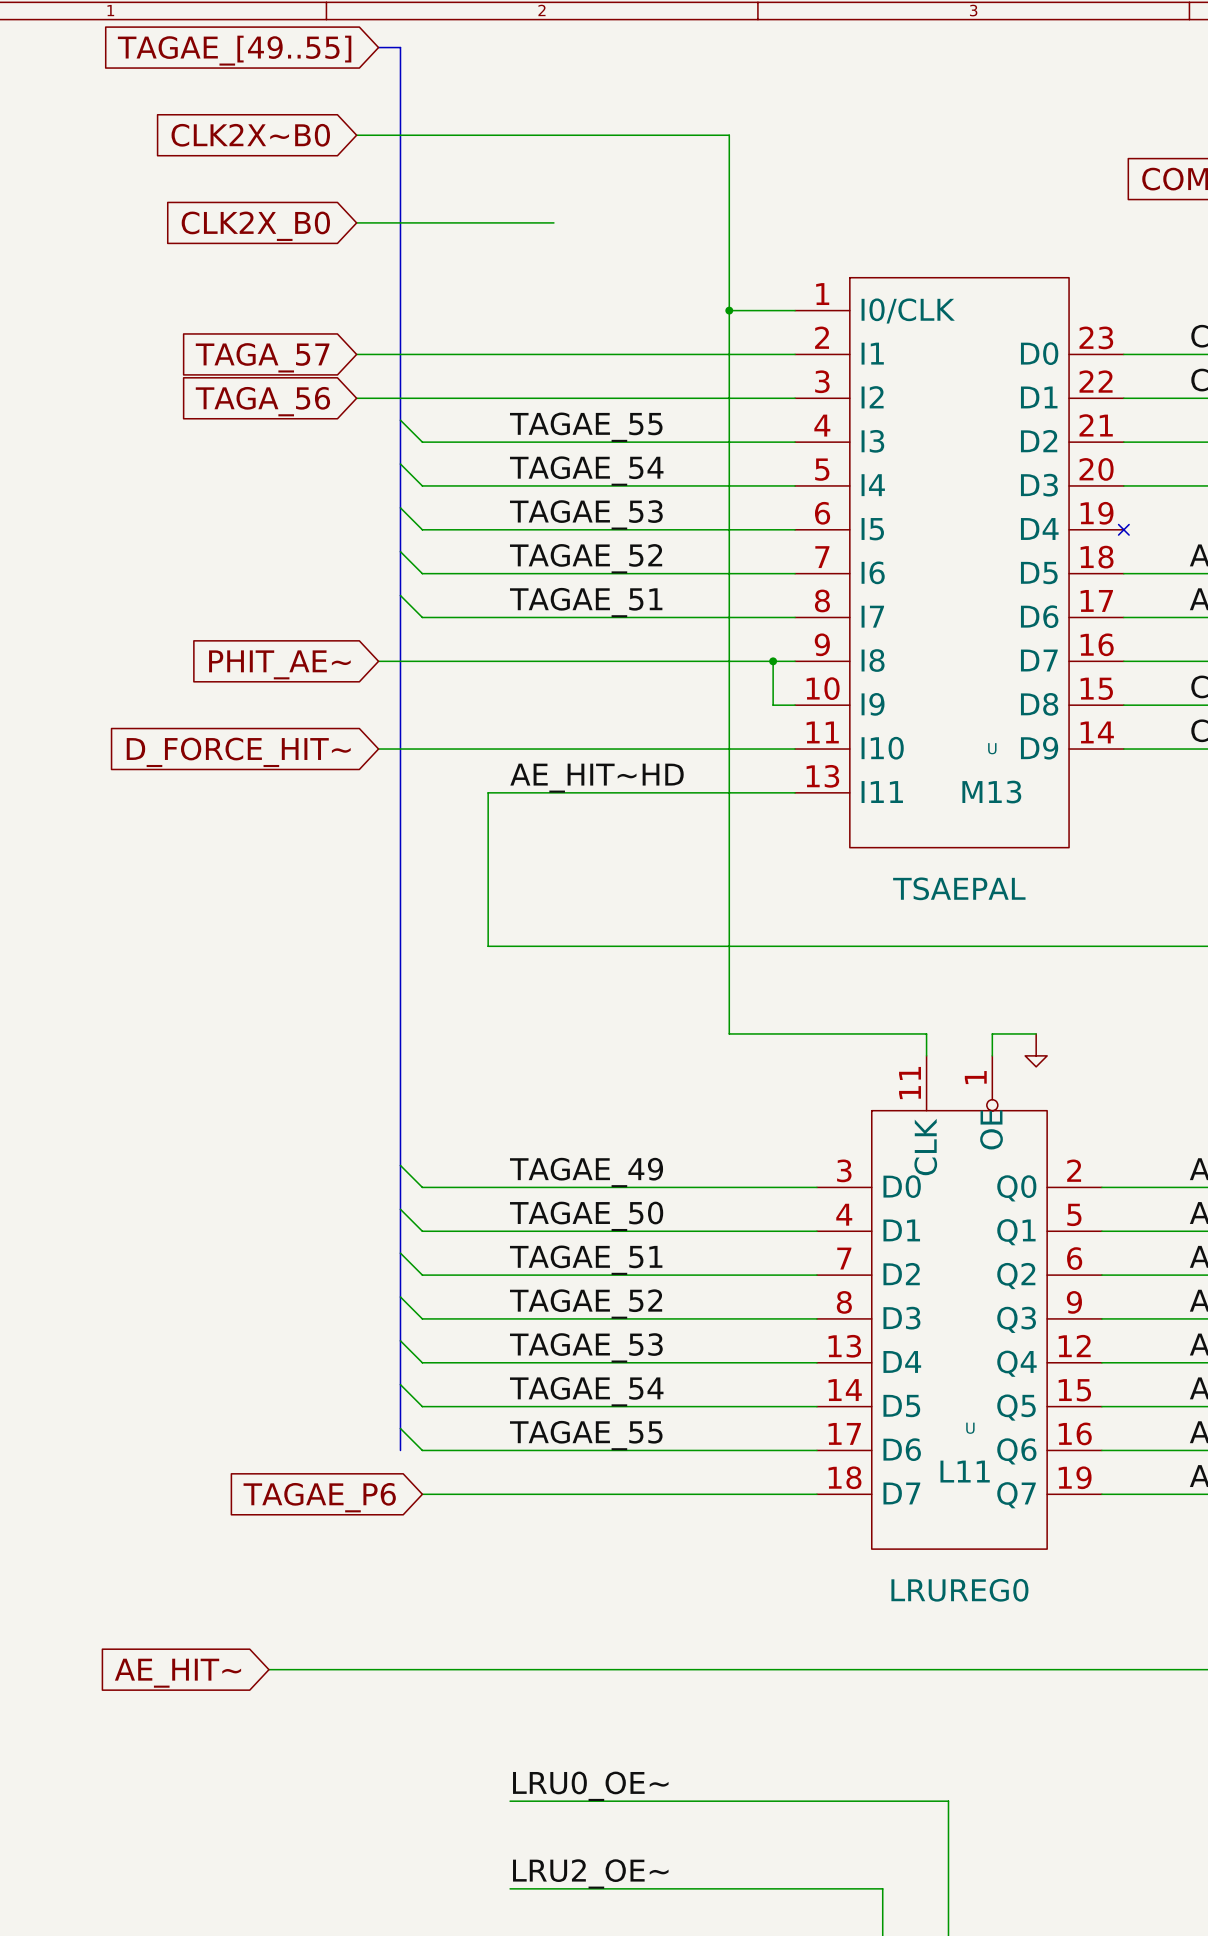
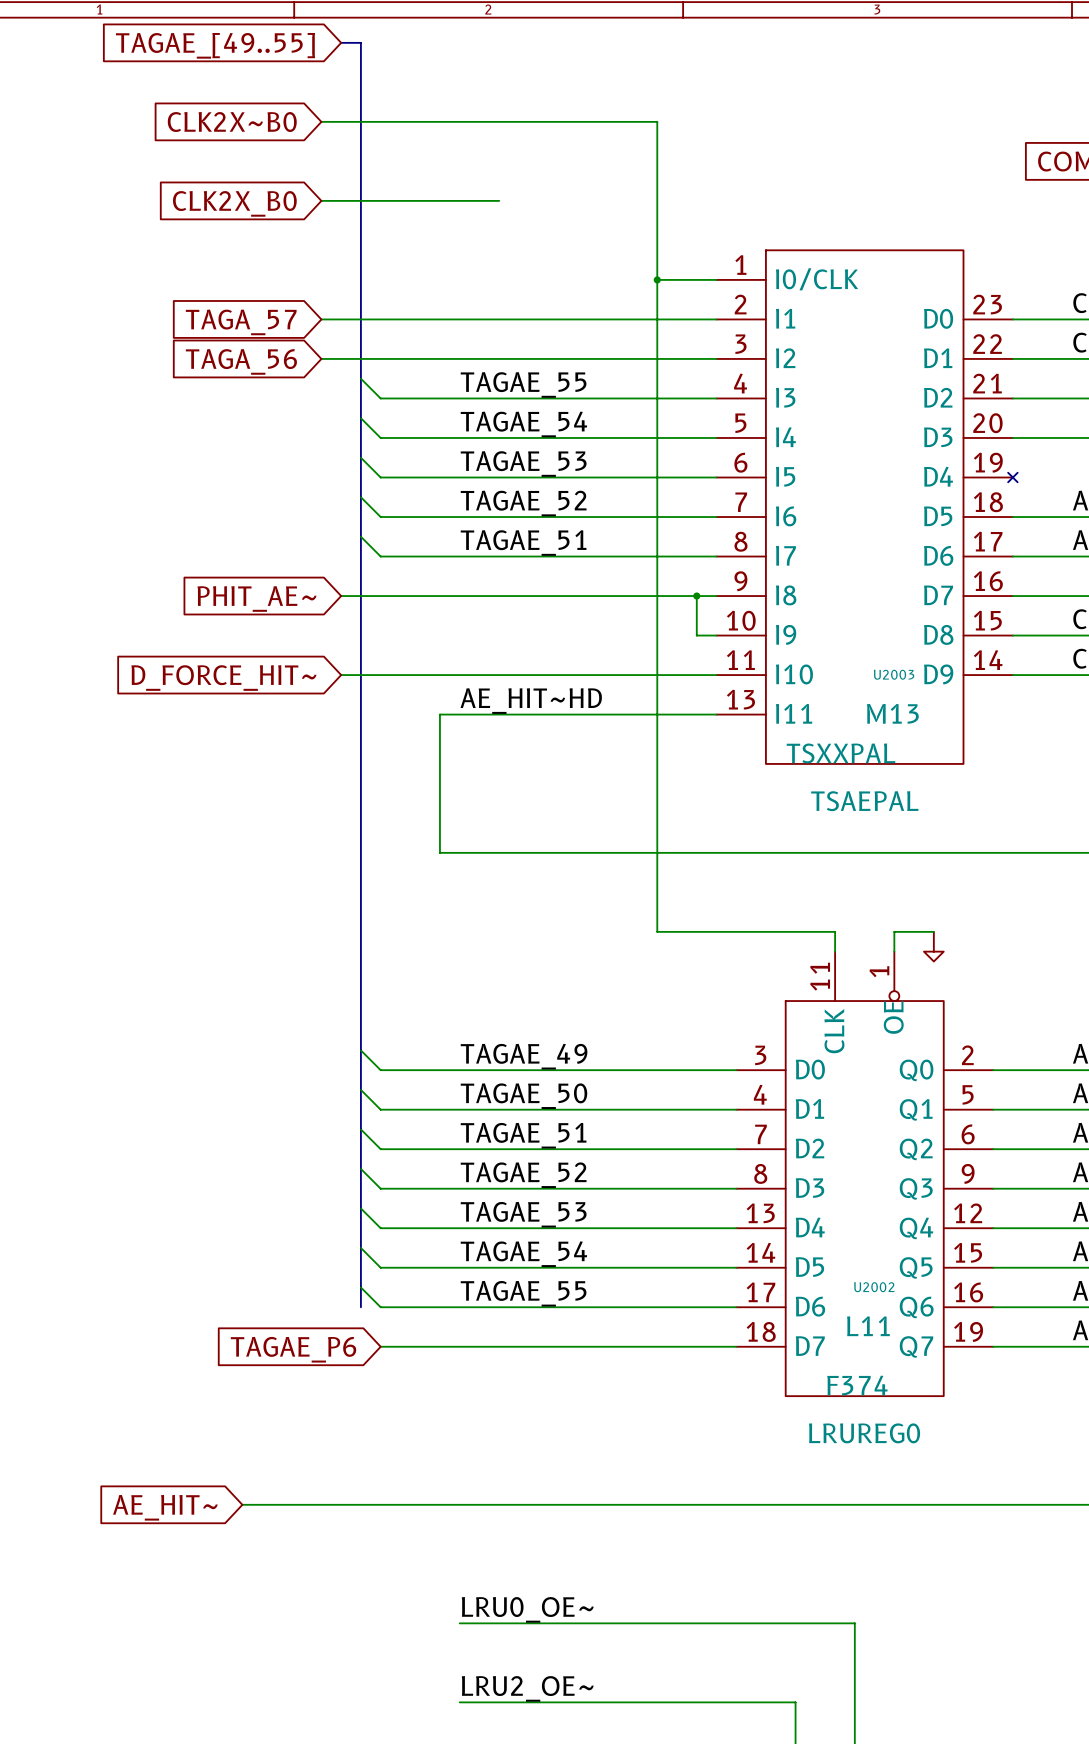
U name: U (992, 748) -> U2003 (894, 674)
U value: none -> TSXXPAL (841, 753)
U name: U (970, 1428) -> U2002 (874, 1287)
U value: none -> F374 (857, 1385)

